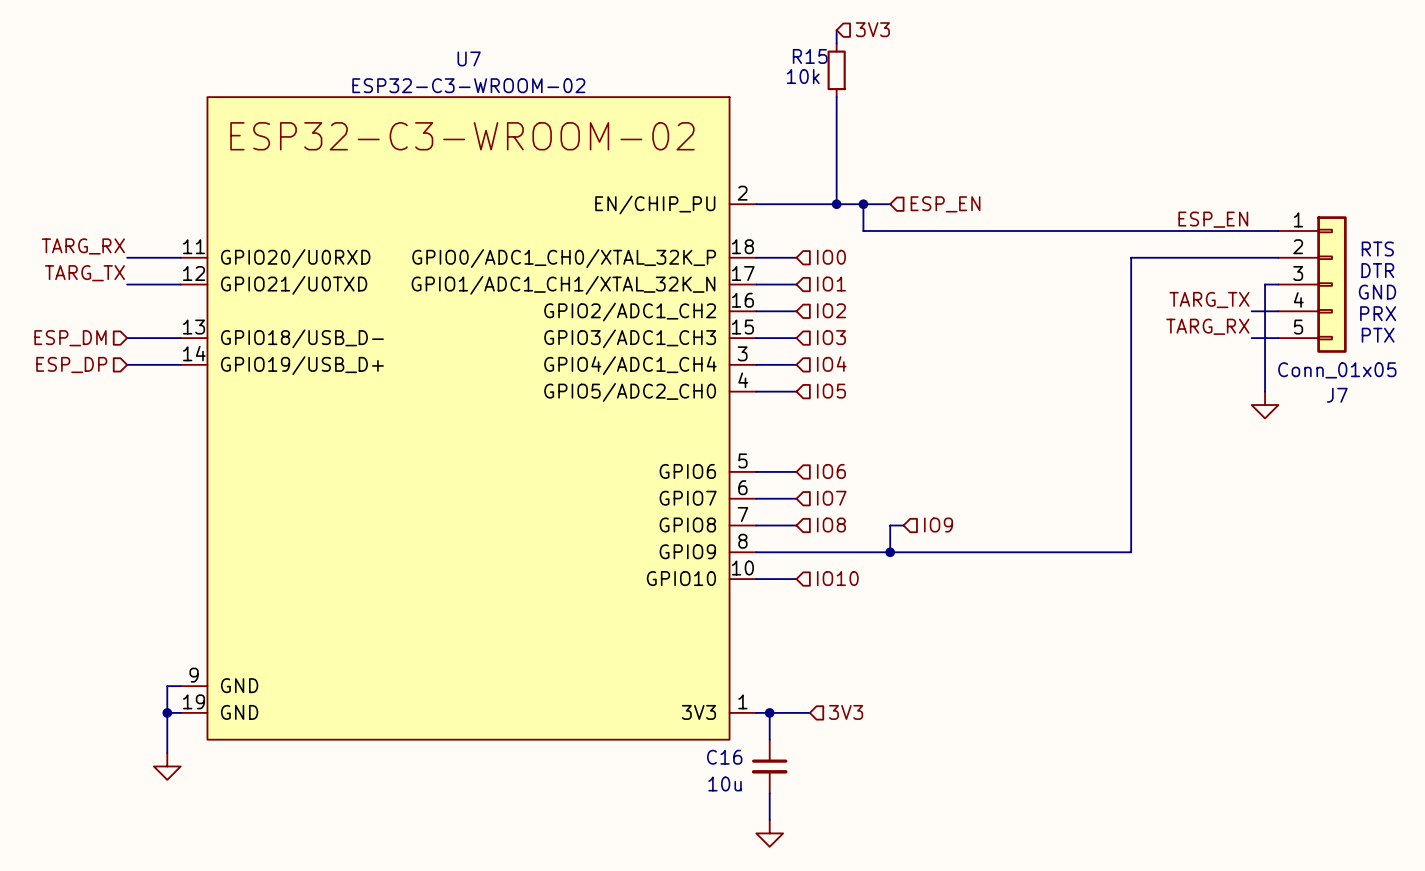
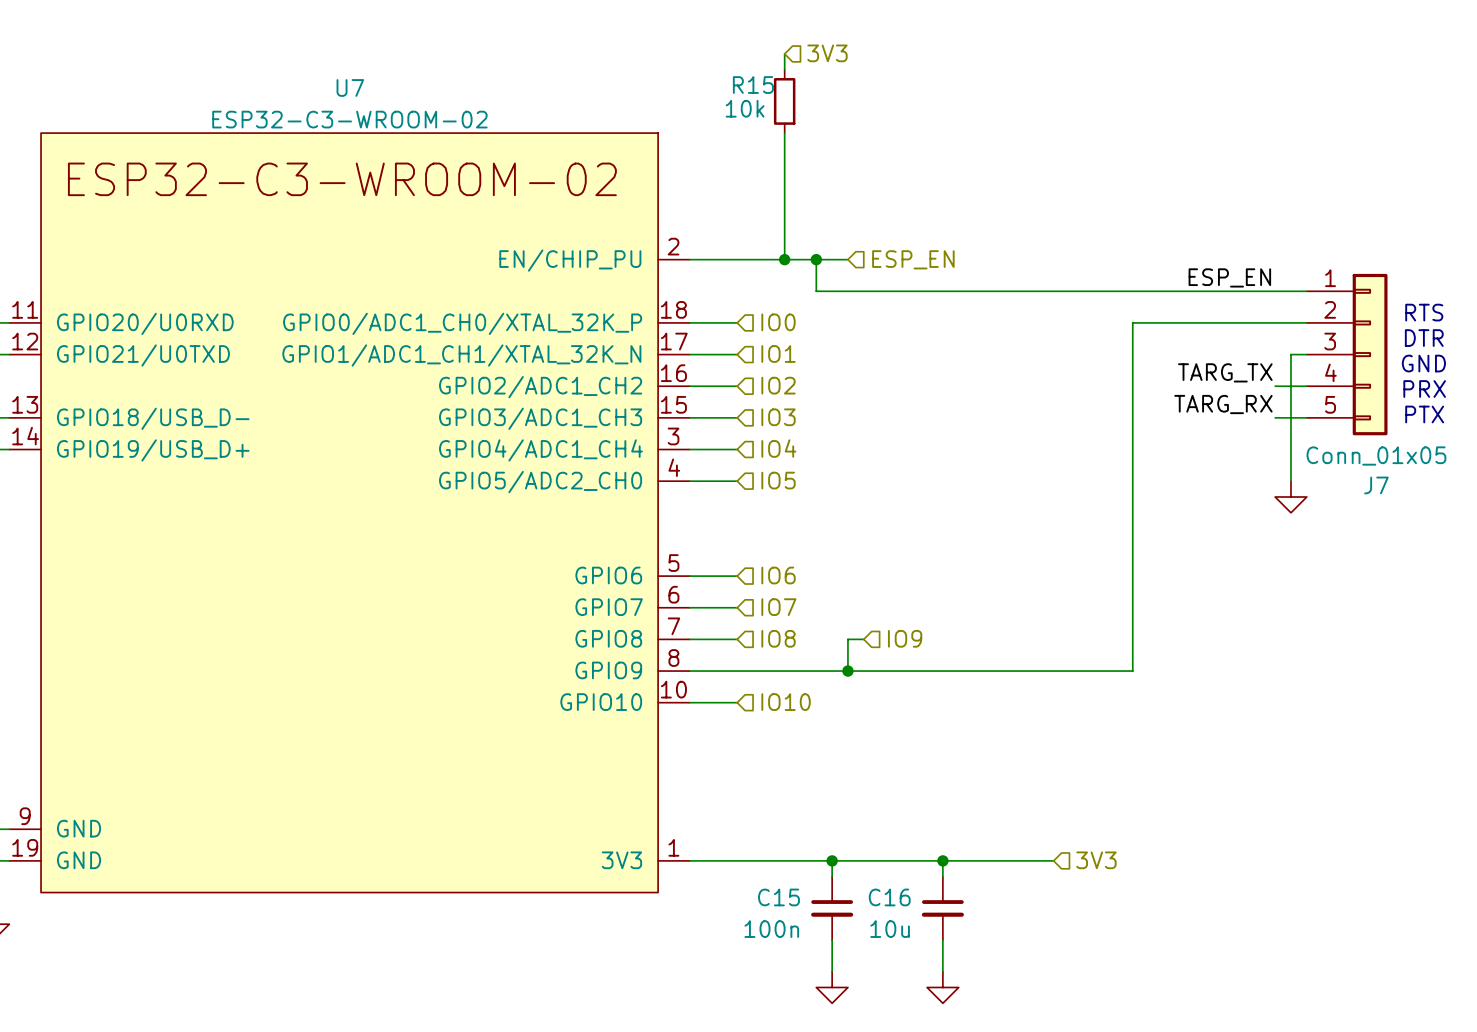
wire: (769, 712) (769, 739) -> (942, 940) (942, 971)
junction: (769, 712) -> none
wire: none -> (753, 860) (1053, 860)
hierarchical label position: 3V3 (846, 712) -> 3V3 (1096, 860)
wire: none -> (832, 860) (832, 876)
junction: none -> (832, 860)
wire: none -> (942, 860) (942, 876)
junction: none -> (942, 860)
C15: none -> 100n (832, 908)
C16 position: (769, 766) -> (942, 908)
wire: (769, 793) (769, 820) -> (832, 940) (832, 971)
power symbol: none -> (832, 987)
power symbol: none -> (942, 987)
power symbol: (769, 833) -> none

